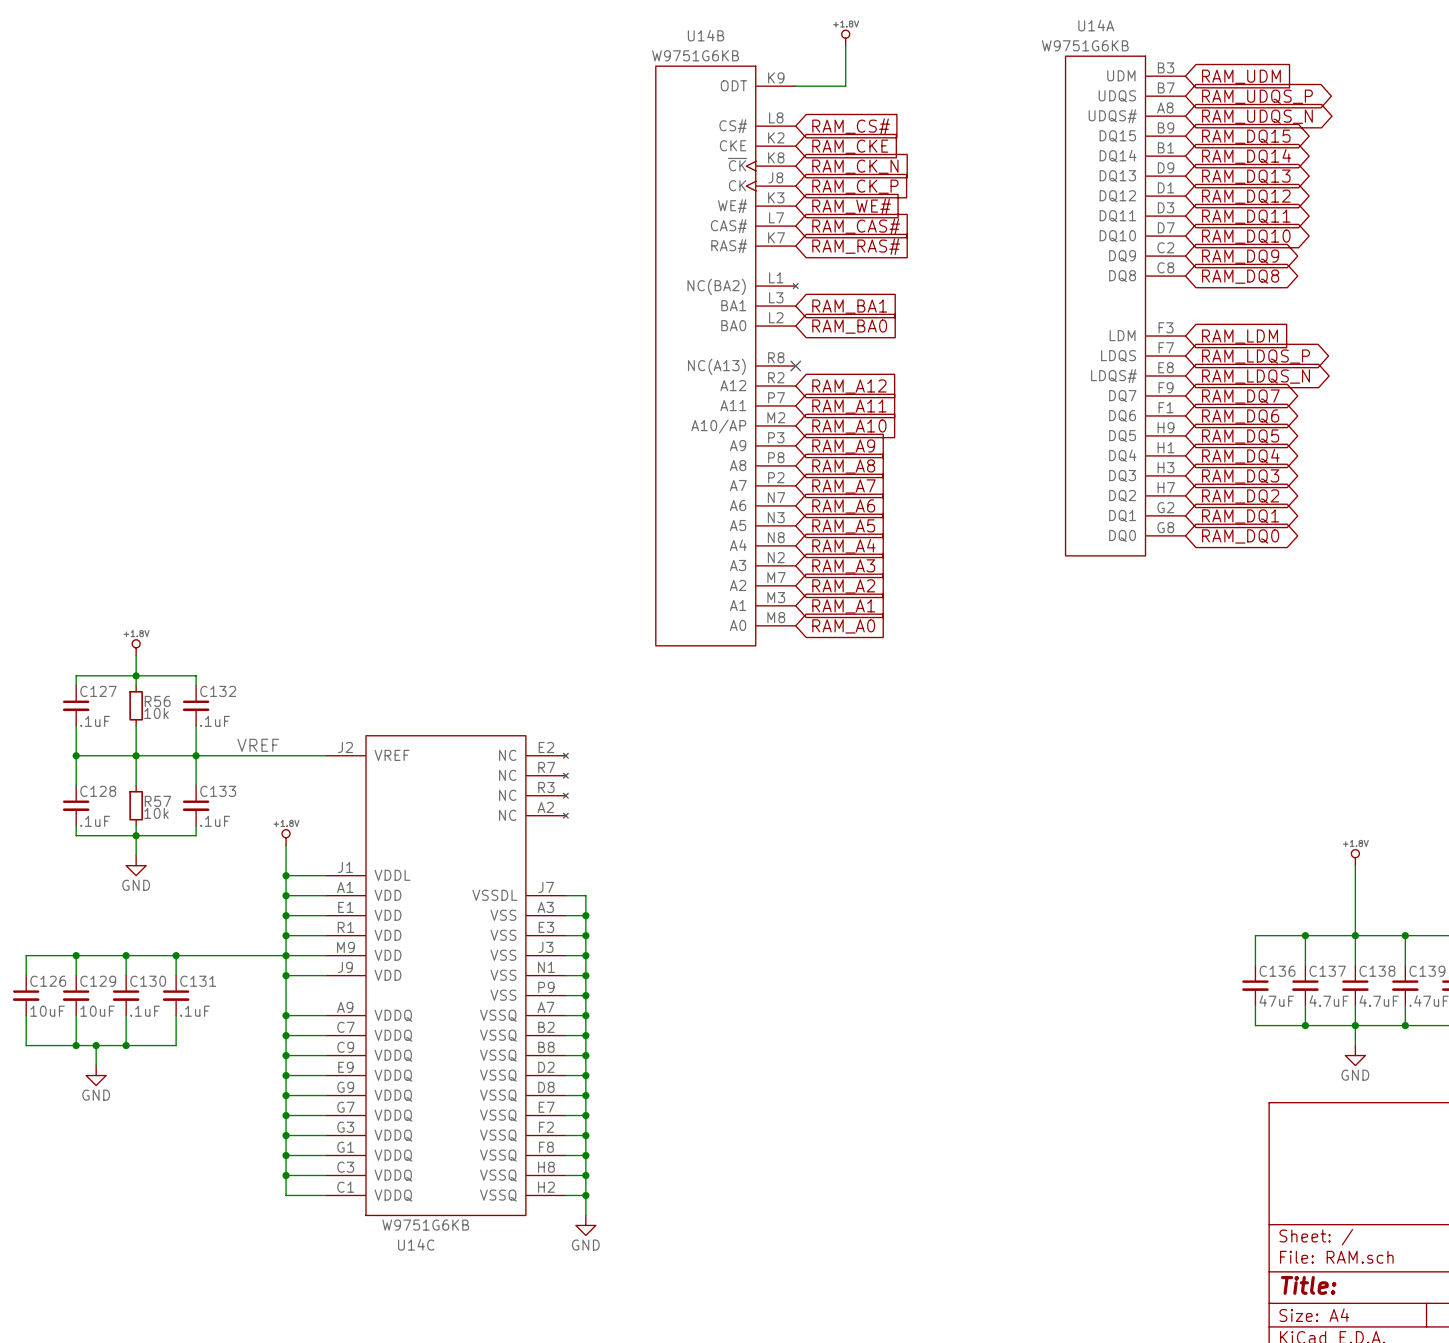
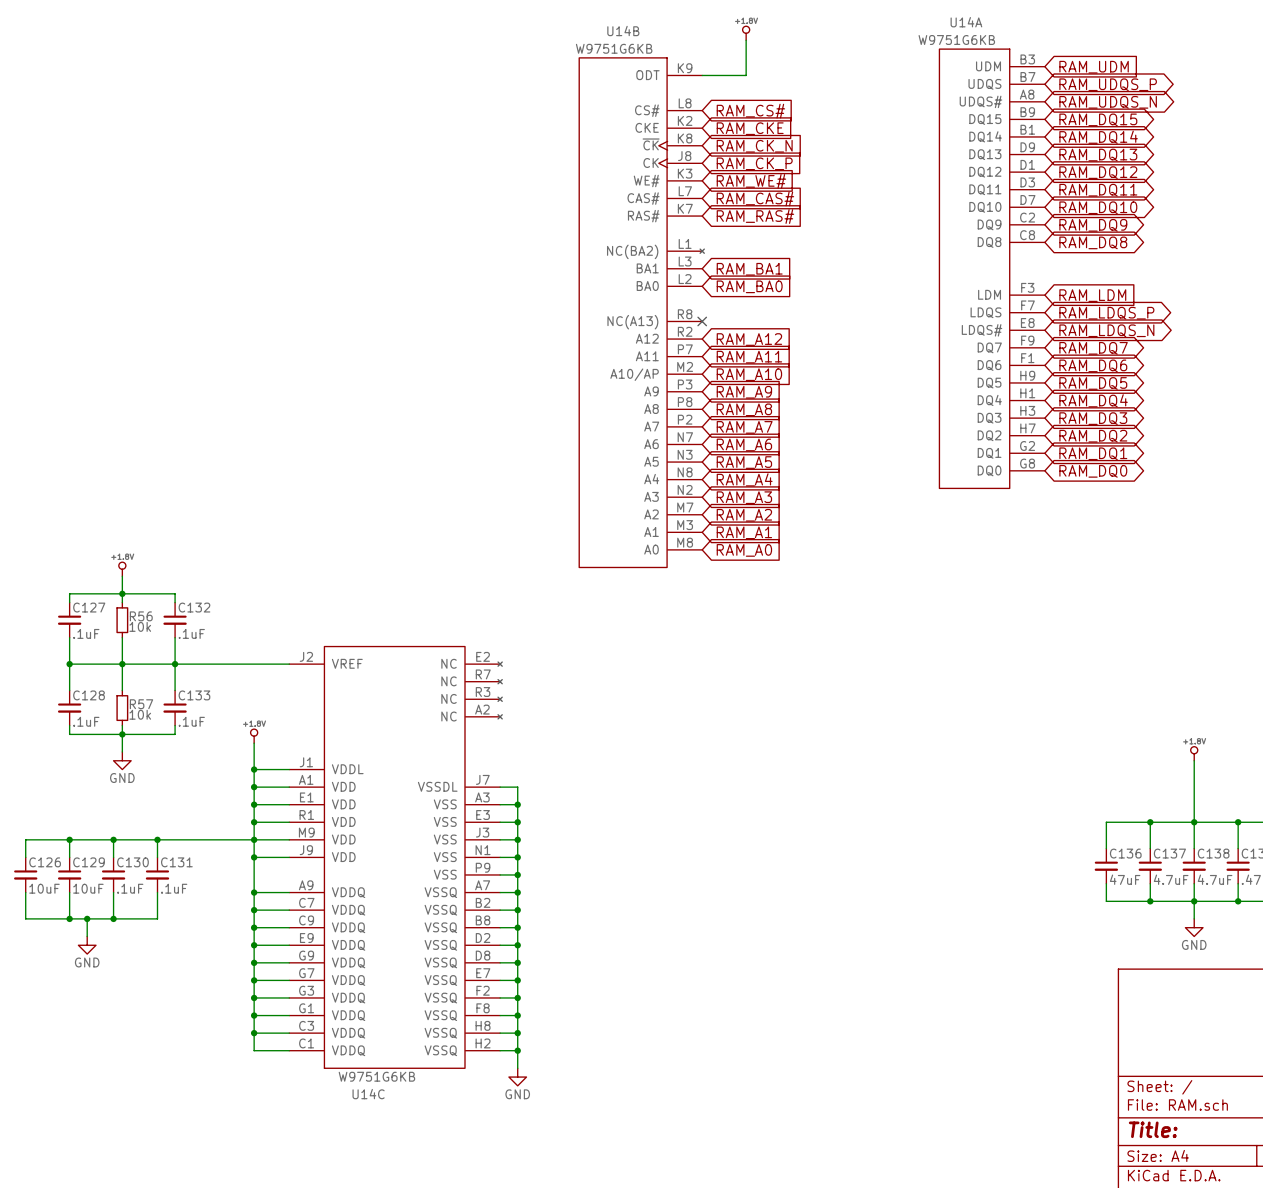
label: VREF (258, 745) -> none

